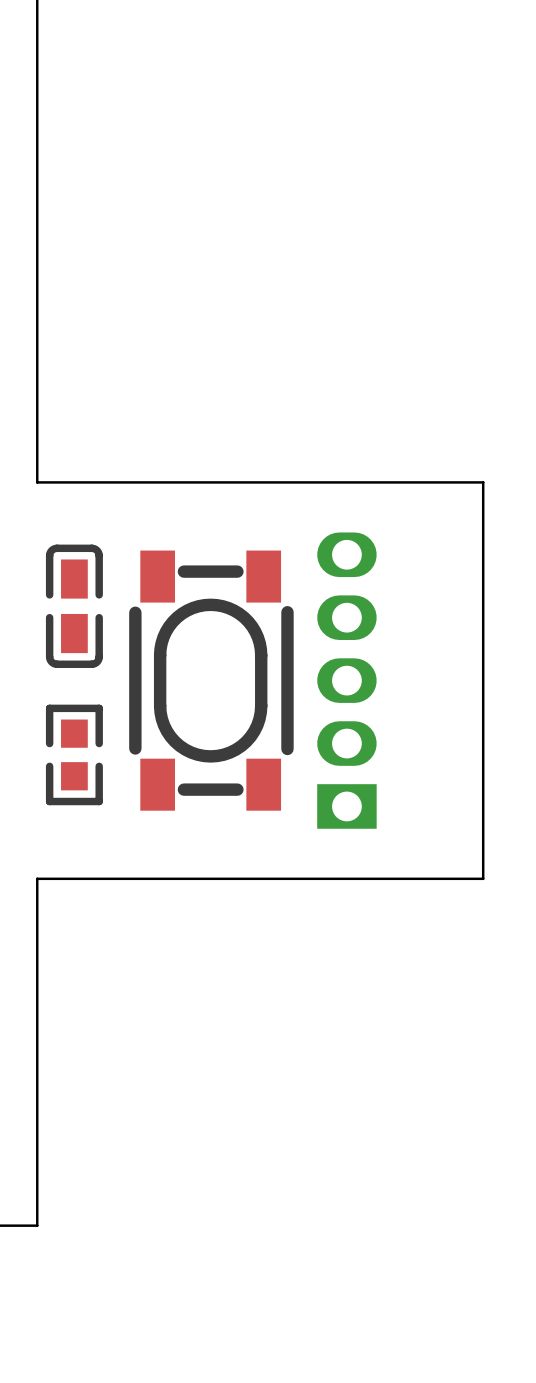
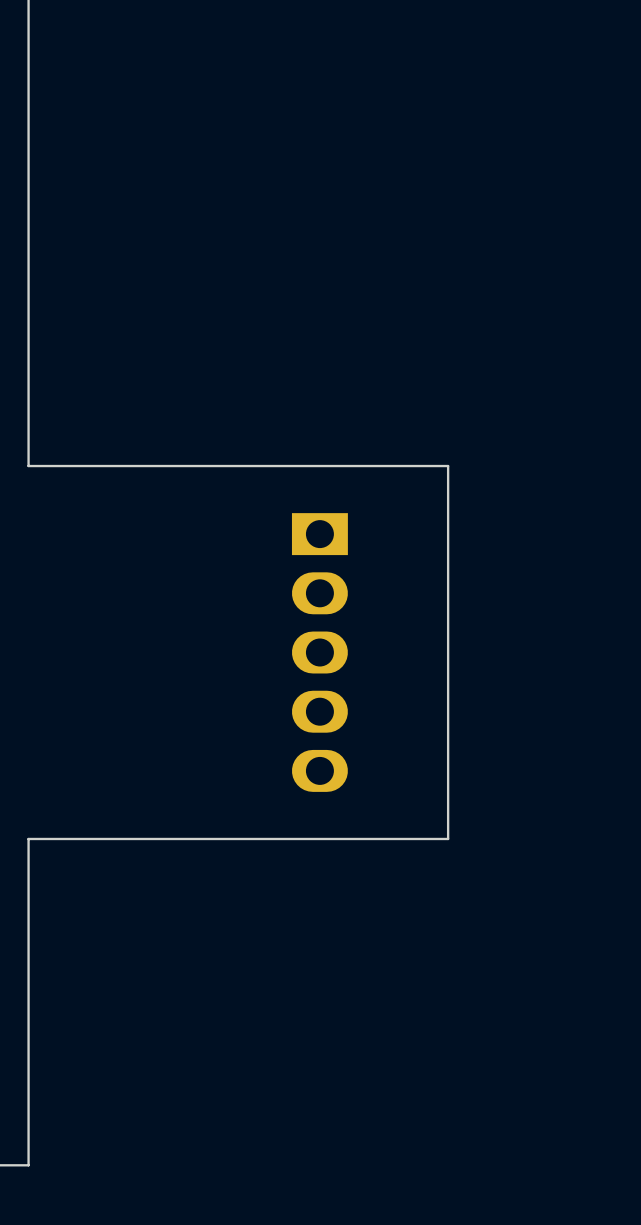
part: (74, 606) -> none
part: (211, 680) -> none
part rotation: 0° (346, 680) -> 180° (319, 652)
part: (74, 754) -> none

